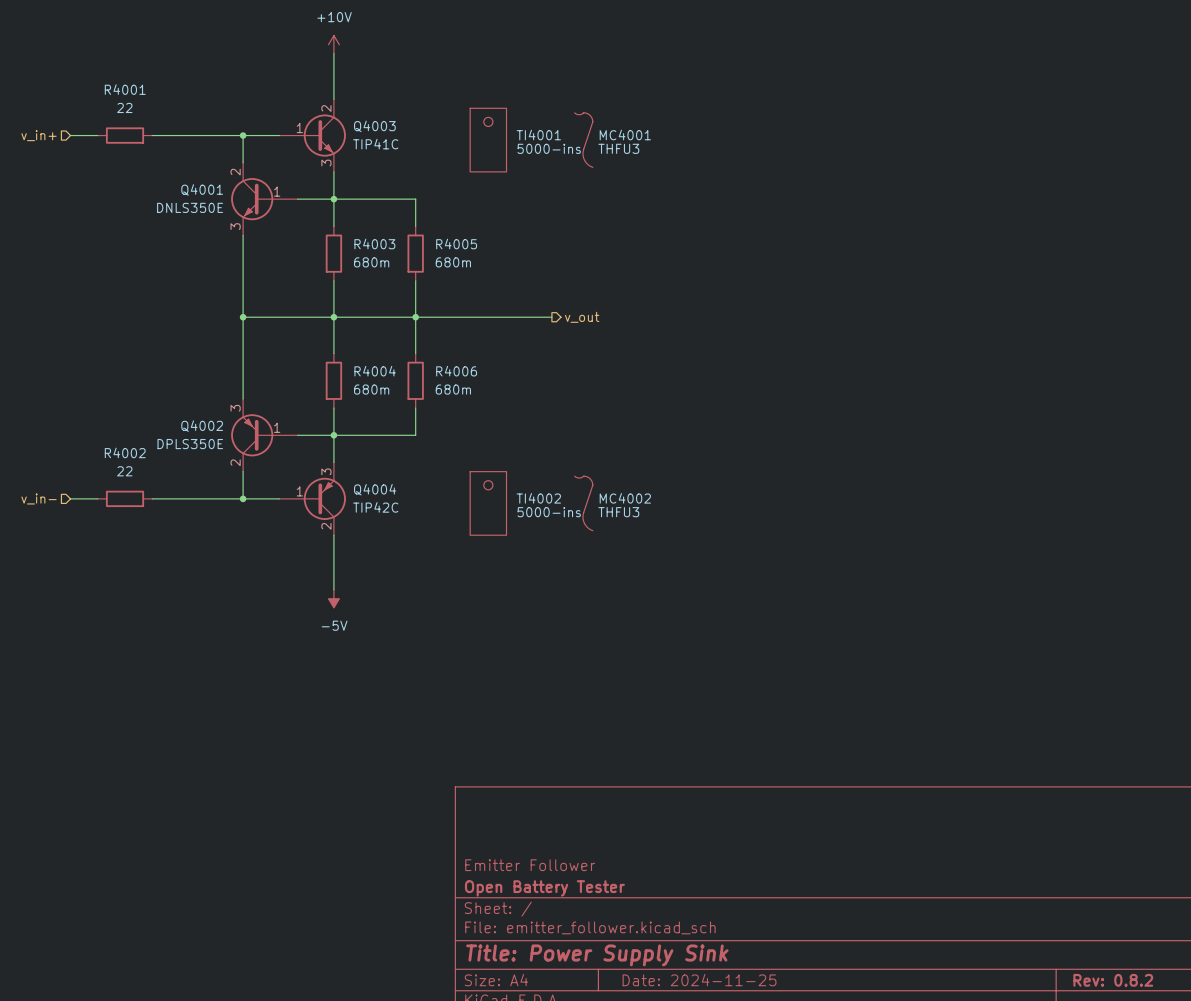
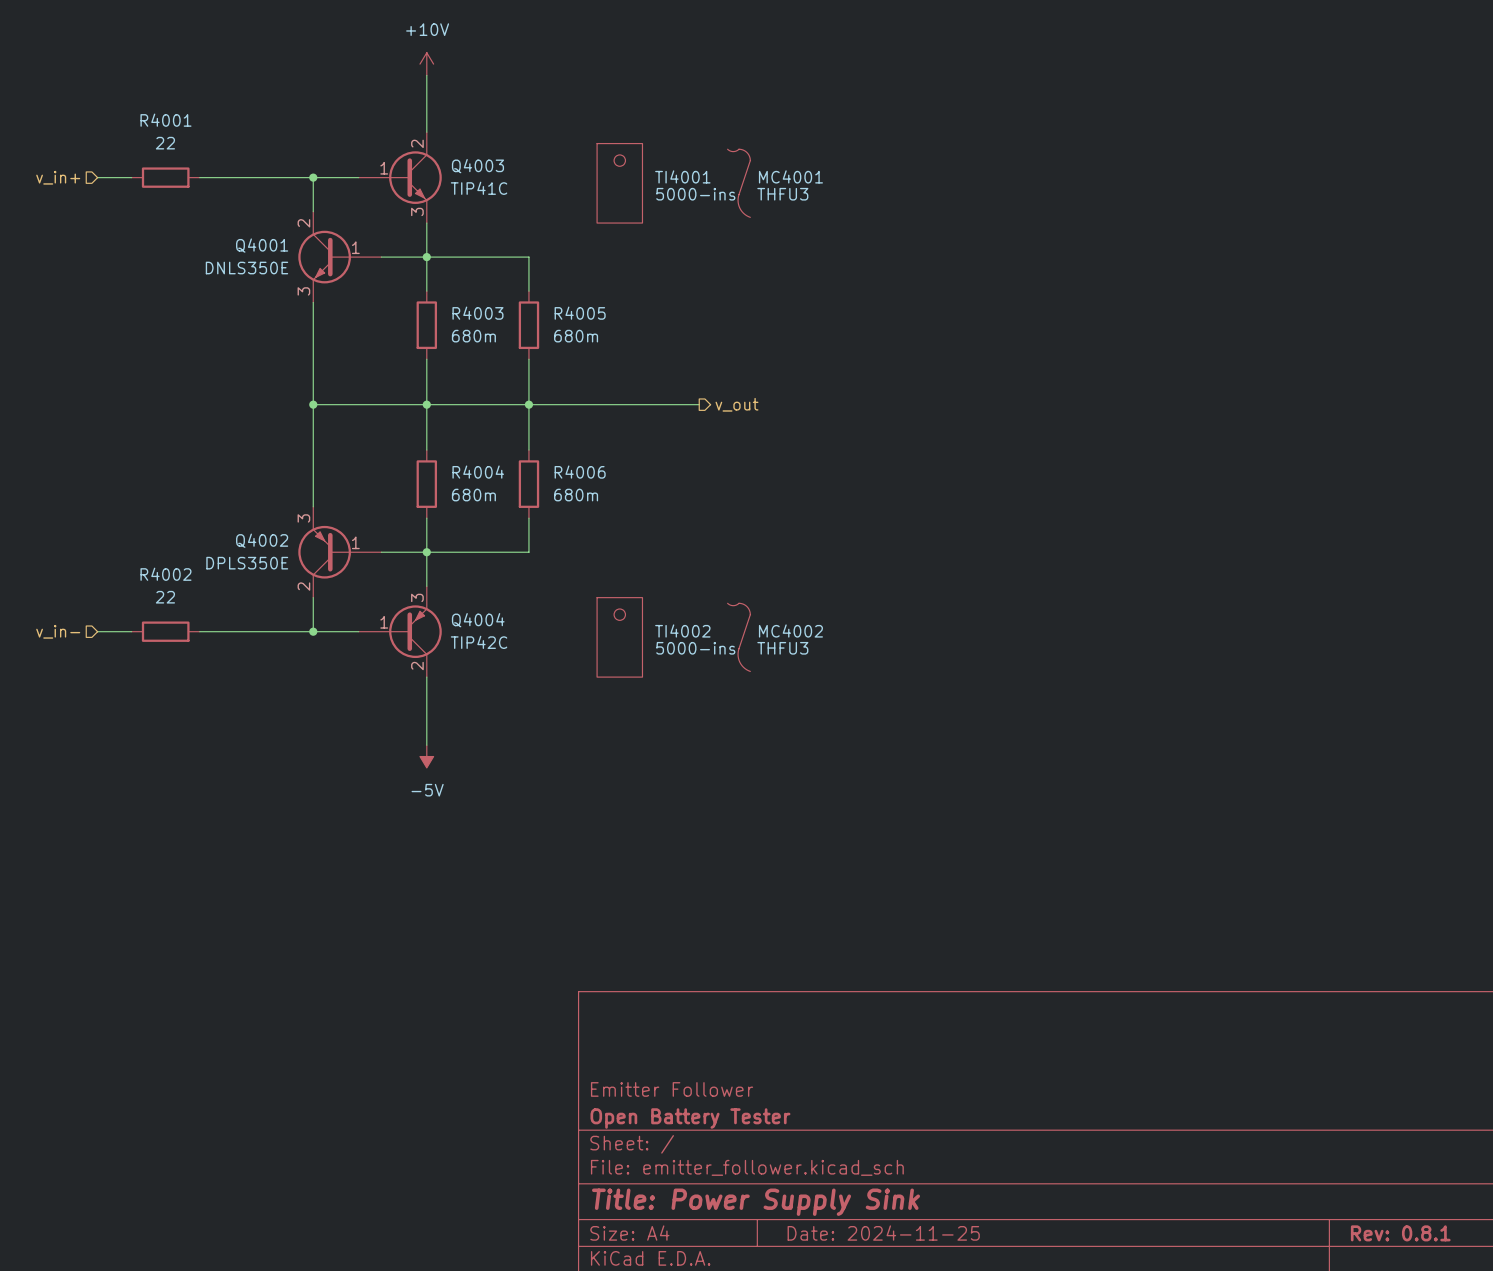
title block: Rev: 0.8.2 (1113, 980) -> Rev: 0.8.1 (1400, 1233)

